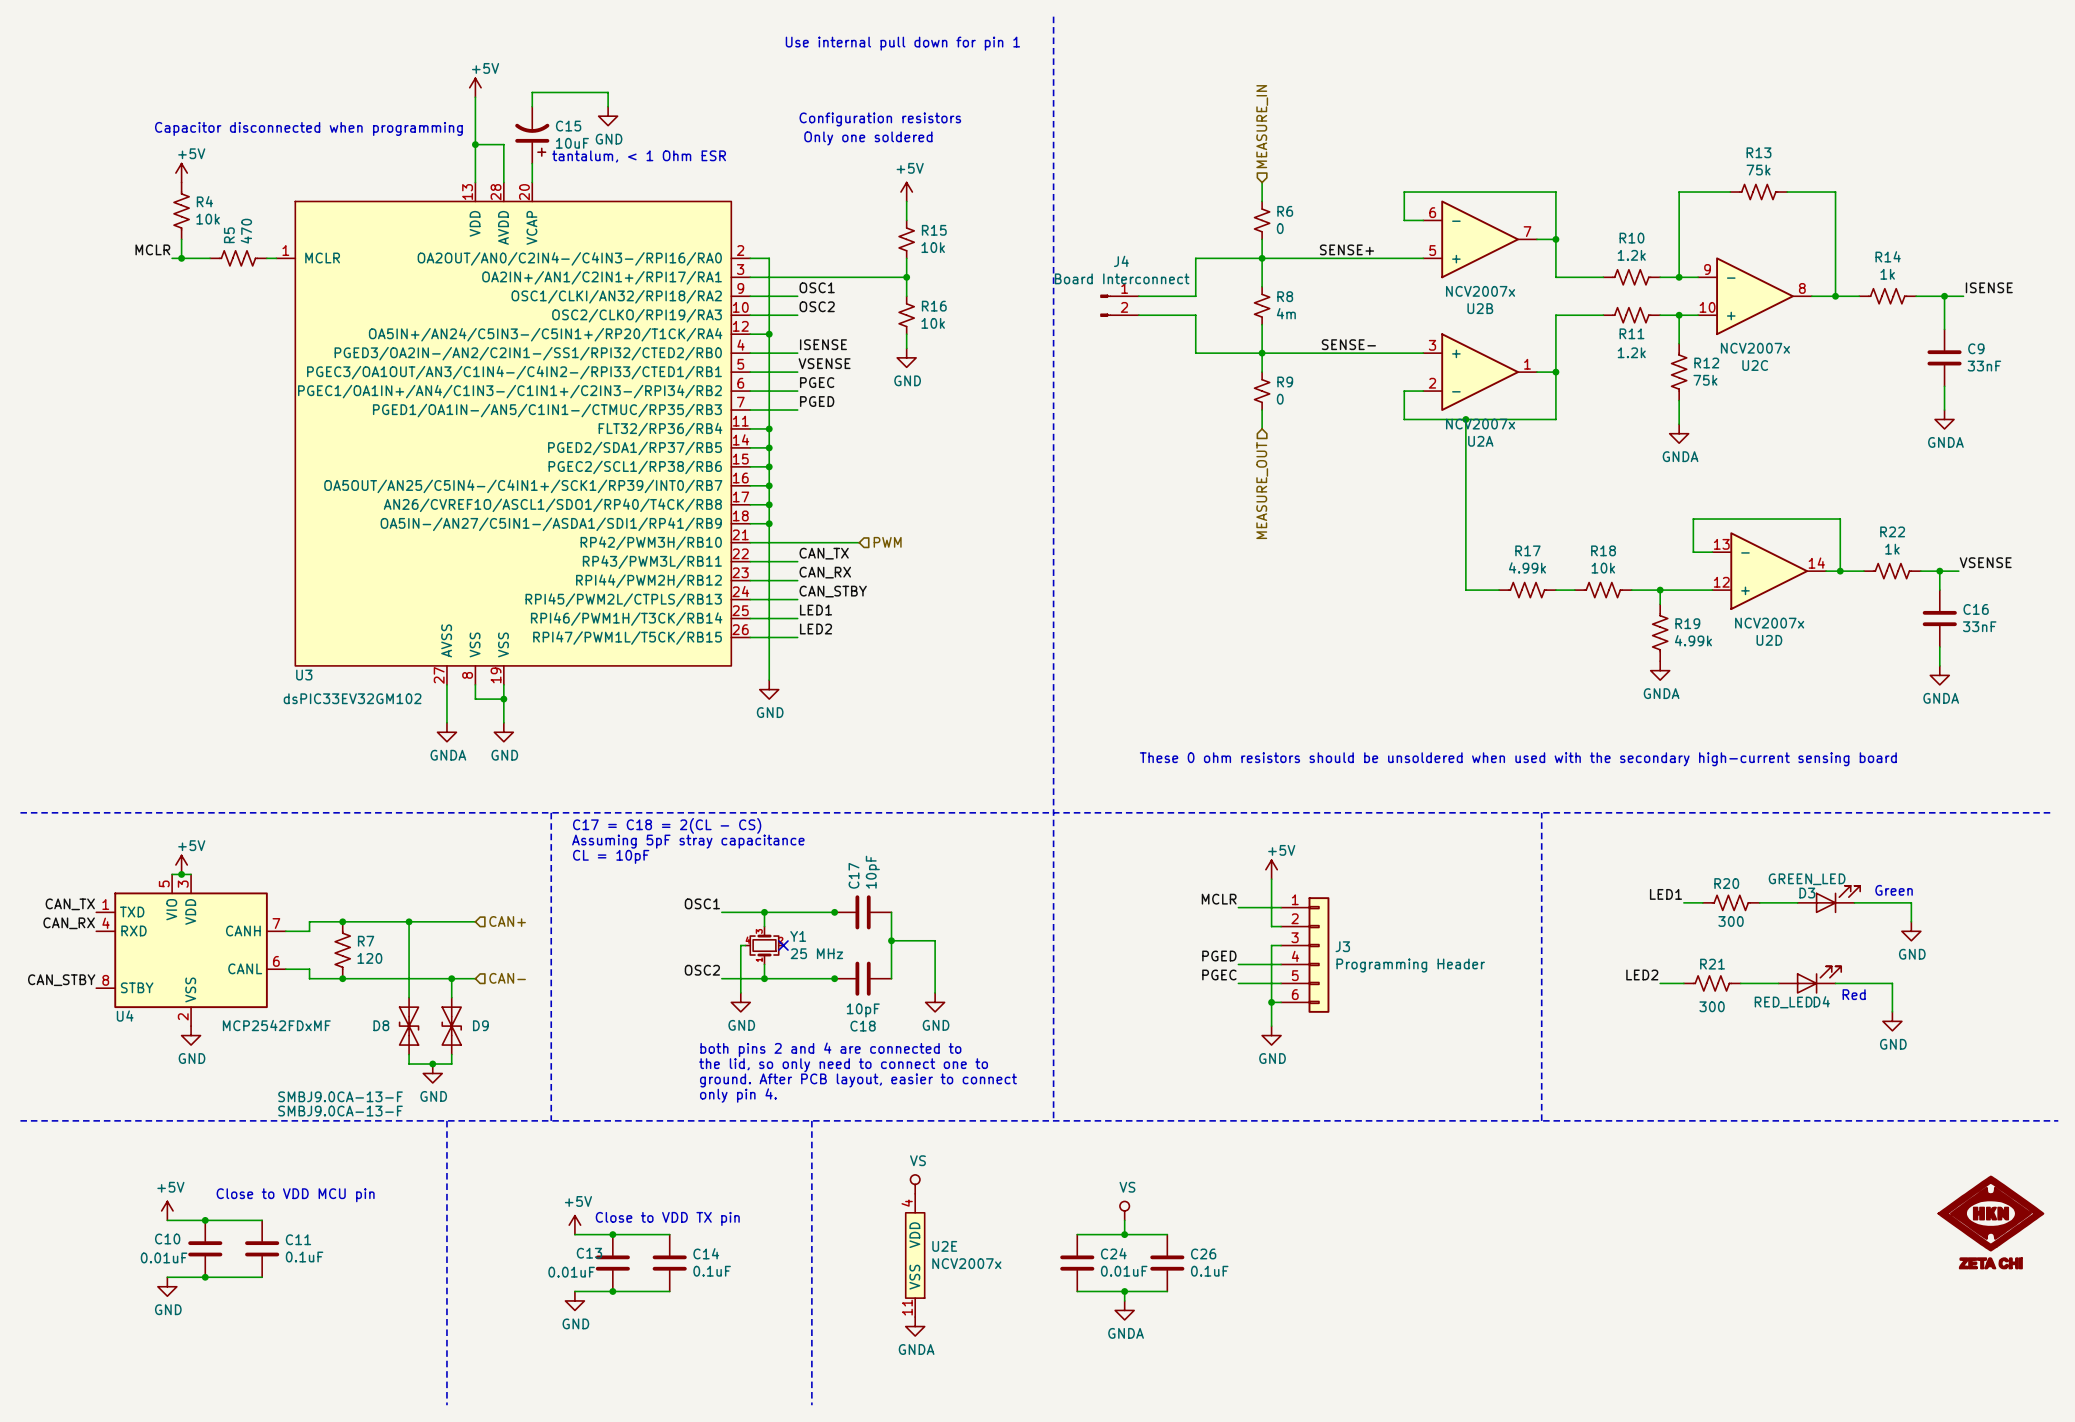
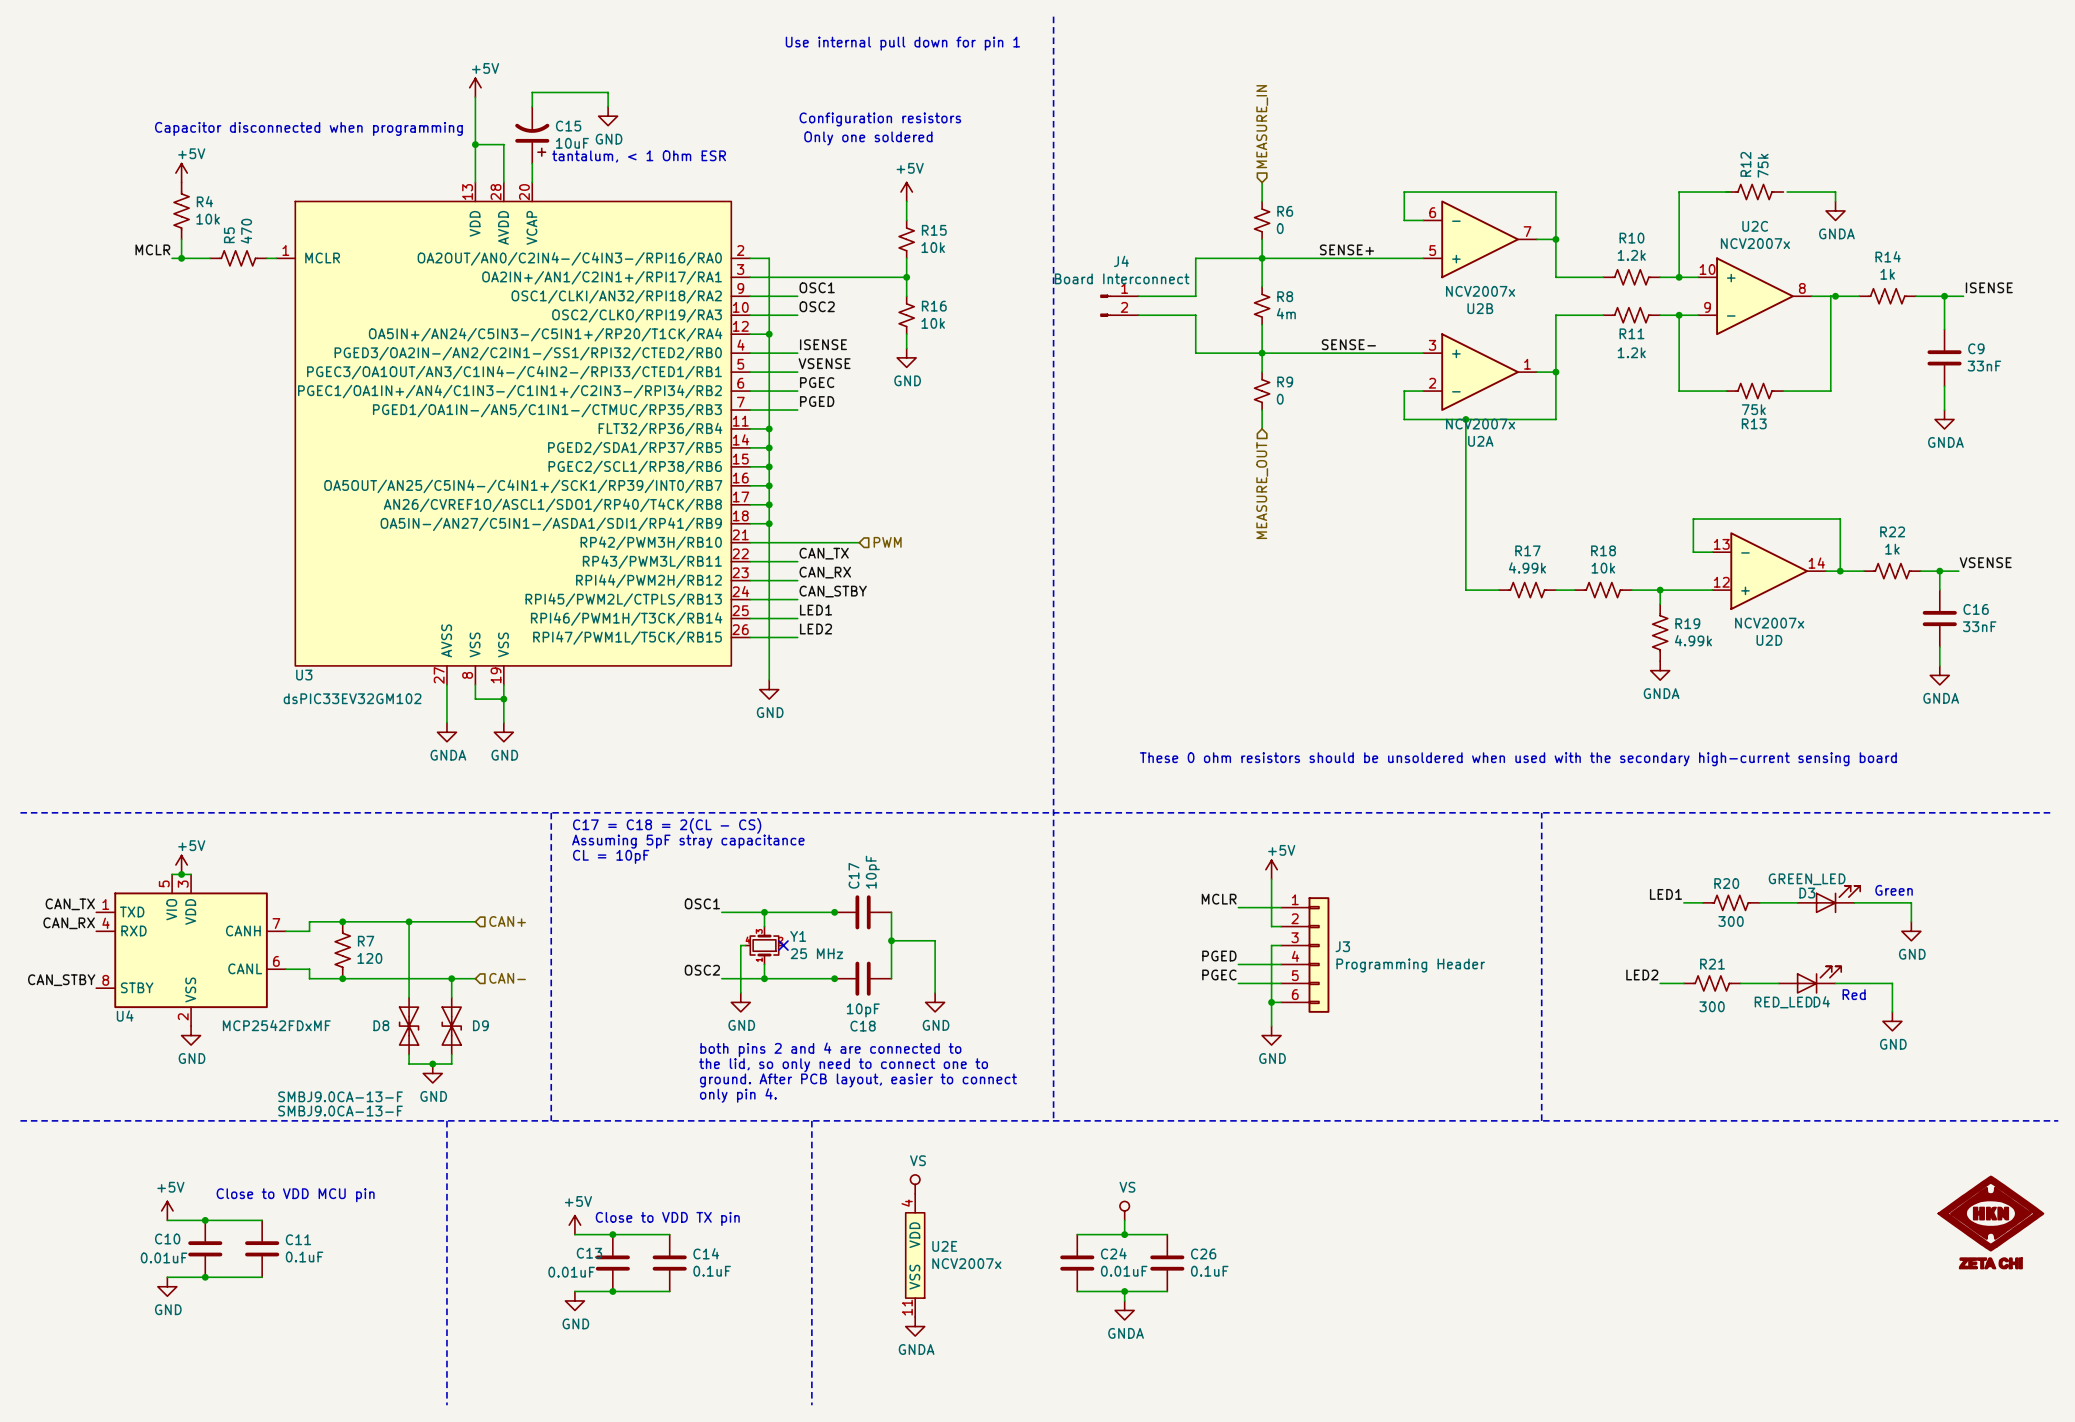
R13 name position: R13 (1758, 152) -> R13 (1754, 423)
R13 value position: 75k (1758, 170) -> 75k (1753, 409)
R13 position: (1758, 192) -> (1754, 391)
wire: (1835, 201) (1835, 296) -> none
power symbol: none -> GNDA (1835, 210)
U2C flip: as is (1754, 296) -> up-down (1754, 296)
wire: none -> (1830, 296) (1830, 391) (1783, 391)
wire: none -> (1679, 343) (1679, 391) (1726, 391)
R12 name position: R12 (1706, 363) -> R12 (1745, 164)
R12 rotation: 0° (1679, 372) -> 90° clockwise (1754, 192)
R12 position: (1679, 372) -> (1754, 192)
R12 value position: 75k (1705, 380) -> 75k (1763, 165)
wire: (1679, 400) (1679, 424) -> none
power symbol: GNDA (1679, 433) -> none

